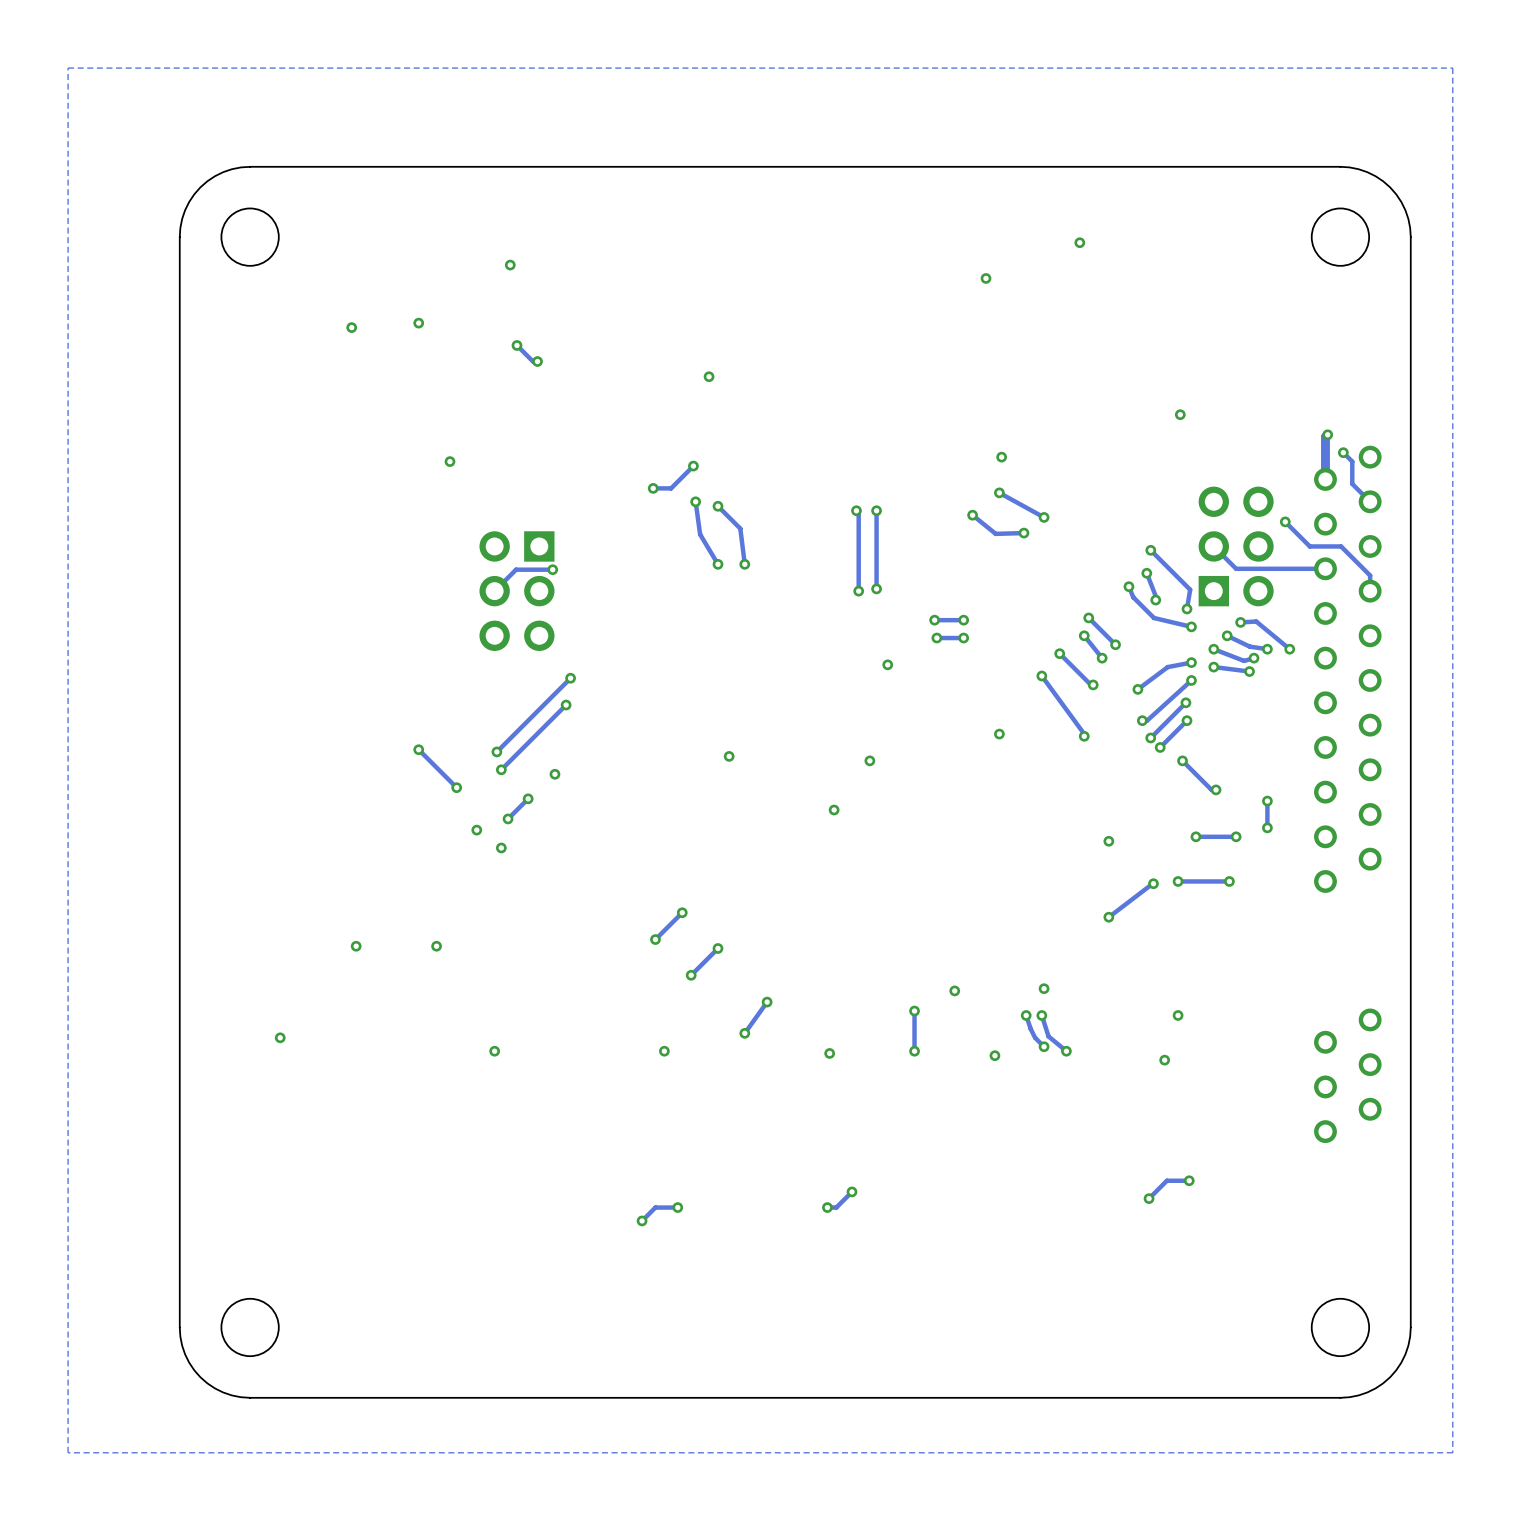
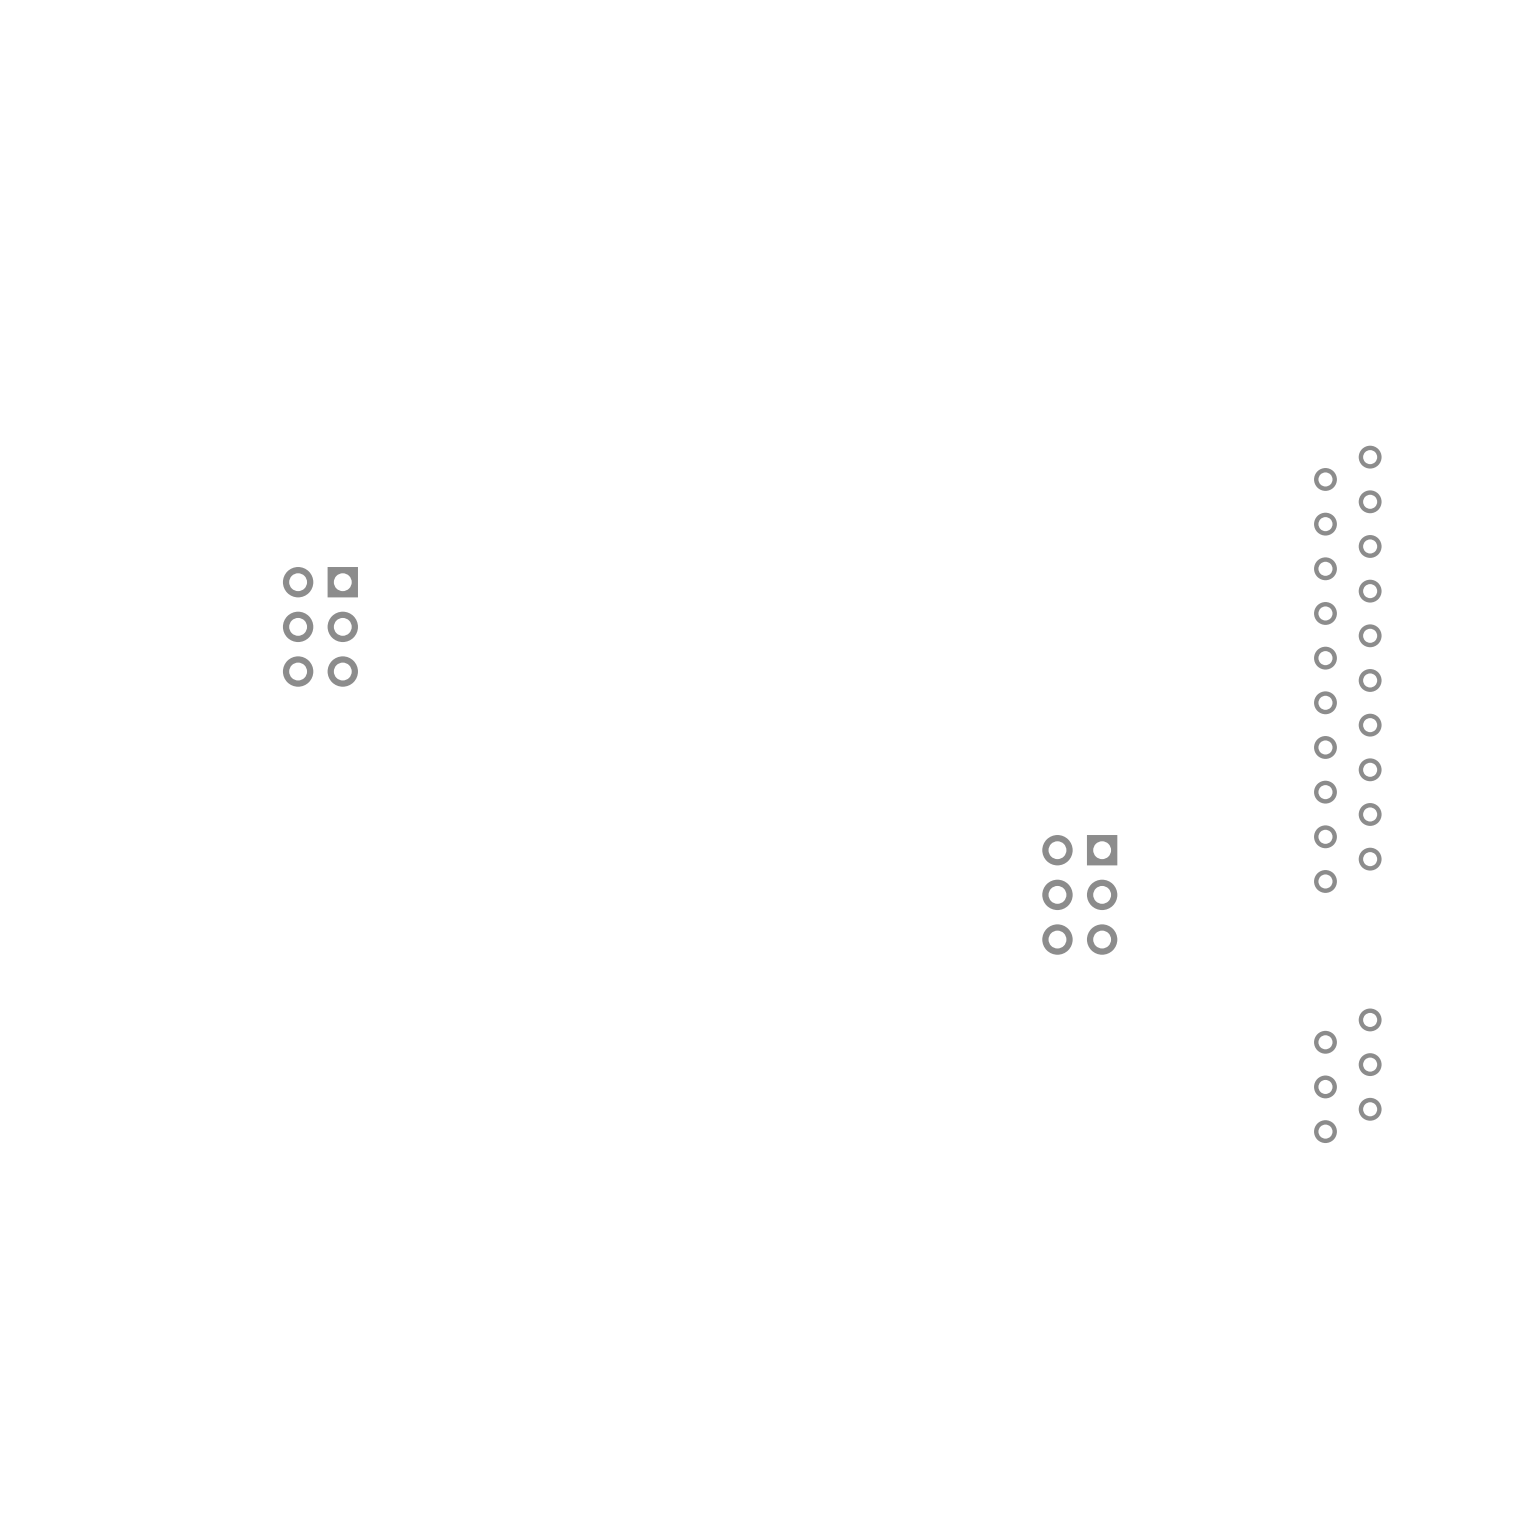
zone outline: (1452, 68) (1452, 1452) (68, 1452) (68, 68) (1452, 68) -> none
board edge: (1340, 166) (250, 166) (223, 172) (200, 187) (185, 210) (179, 237) (179, 1327) (185, 1354) (200, 1377) (223, 1392) (250, 1397) (1340, 1397) (1367, 1392) (1390, 1377) (1405, 1354) (1410, 1327) (1410, 237) (1405, 210) (1390, 187) (1367, 172) (1340, 166) -> none
round board edge: [220, 207, 280, 267] -> none
round board edge: [1310, 207, 1371, 267] -> none
via: (1079, 242) -> none
via: (510, 265) -> none
via: (986, 278) -> none
via: (418, 323) -> none
via: (351, 327) -> none
track: (516, 345) (533, 361) (537, 361) -> none
via: (516, 345) -> none
via: (537, 361) -> none
via: (709, 376) -> none
via: (1180, 414) -> none
track: (1327, 434) (1325, 437) (1325, 479) -> none
via: (1327, 434) -> none
track: (1343, 452) (1352, 461) (1352, 483) (1370, 501) -> none
via: (1343, 452) -> none
via: (1001, 457) -> none
via: (449, 461) -> none
track: (693, 466) (671, 488) (653, 488) -> none
via: (693, 466) -> none
via: (653, 488) -> none
track: (999, 492) (1044, 517) -> none
via: (999, 492) -> none
track: (695, 501) (700, 534) (717, 564) -> none
via: (695, 501) -> none
track: (717, 506) (740, 528) (744, 564) -> none
via: (717, 506) -> none
track: (856, 510) (858, 512) (858, 591) -> none
via: (856, 510) -> none
track: (876, 510) (876, 588) -> none
via: (876, 510) -> none
track: (972, 515) (995, 533) (1023, 533) -> none
via: (972, 515) -> none
via: (1044, 517) -> none
track: (1285, 521) (1309, 546) (1341, 546) (1370, 575) (1370, 591) -> none
via: (1285, 521) -> none
via: (1023, 533) -> none
track: (1213, 546) (1236, 568) (1325, 568) -> none
part: (1236, 546) -> none
track: (1150, 550) (1190, 589) (1187, 609) -> none
via: (1150, 550) -> none
via: (717, 564) -> none
via: (744, 564) -> none
track: (552, 569) (516, 569) (494, 591) -> none
via: (552, 569) -> none
track: (1146, 573) (1155, 600) -> none
via: (1146, 573) -> none
track: (1128, 586) (1133, 597) (1154, 618) (1191, 626) -> none
via: (1128, 586) -> none
via: (876, 588) -> none
part position: (516, 591) -> (320, 626)
via: (858, 591) -> none
via: (1155, 600) -> none
via: (1187, 609) -> none
track: (1088, 617) (1115, 644) -> none
via: (1088, 617) -> none
via: (934, 620) -> none
track: (963, 620) (934, 620) -> none
via: (963, 620) -> none
track: (1240, 622) (1256, 621) (1289, 649) -> none
via: (1240, 622) -> none
via: (1191, 626) -> none
track: (1084, 635) (1102, 658) -> none
via: (1084, 635) -> none
track: (1227, 635) (1249, 646) (1267, 649) -> none
via: (1227, 635) -> none
via: (936, 638) -> none
track: (963, 638) (936, 638) -> none
via: (963, 638) -> none
via: (1115, 644) -> none
track: (1213, 649) (1244, 660) (1254, 658) -> none
via: (1213, 649) -> none
via: (1267, 649) -> none
via: (1289, 649) -> none
track: (1059, 653) (1090, 684) (1093, 684) -> none
via: (1059, 653) -> none
via: (1102, 658) -> none
via: (1254, 658) -> none
track: (1191, 662) (1167, 667) (1137, 689) -> none
via: (1191, 662) -> none
via: (887, 664) -> none
track: (1213, 667) (1249, 671) -> none
via: (1213, 667) -> none
via: (1249, 671) -> none
track: (1041, 676) (1084, 736) -> none
via: (1041, 676) -> none
track: (570, 678) (496, 751) -> none
via: (570, 678) -> none
track: (1191, 680) (1147, 720) (1142, 720) -> none
via: (1191, 680) -> none
via: (1093, 684) -> none
via: (1137, 689) -> none
track: (1185, 702) (1150, 737) -> none
via: (1185, 702) -> none
track: (566, 705) (501, 769) -> none
via: (566, 705) -> none
via: (1142, 720) -> none
track: (1187, 720) (1160, 747) -> none
via: (1187, 720) -> none
via: (999, 734) -> none
via: (1084, 736) -> none
via: (1150, 737) -> none
via: (1160, 747) -> none
track: (418, 749) (456, 787) -> none
via: (418, 749) -> none
via: (496, 751) -> none
via: (729, 756) -> none
via: (869, 760) -> none
track: (1182, 760) (1211, 789) (1216, 789) -> none
via: (1182, 760) -> none
via: (501, 769) -> none
via: (554, 774) -> none
via: (456, 787) -> none
via: (1216, 789) -> none
track: (528, 798) (508, 818) -> none
via: (528, 798) -> none
track: (1267, 801) (1267, 827) -> none
via: (1267, 801) -> none
via: (834, 810) -> none
via: (508, 818) -> none
via: (1267, 827) -> none
via: (476, 830) -> none
via: (1195, 836) -> none
track: (1236, 836) (1195, 836) -> none
via: (1236, 836) -> none
via: (1108, 841) -> none
via: (501, 847) -> none
via: (1178, 881) -> none
track: (1229, 881) (1178, 881) -> none
via: (1229, 881) -> none
track: (1153, 883) (1108, 917) -> none
via: (1153, 883) -> none
part: none -> (1079, 894)
track: (682, 912) (655, 939) -> none
via: (682, 912) -> none
via: (1108, 917) -> none
via: (655, 939) -> none
via: (356, 946) -> none
via: (436, 946) -> none
track: (717, 948) (691, 975) -> none
via: (717, 948) -> none
via: (691, 975) -> none
via: (1044, 988) -> none
via: (954, 990) -> none
track: (767, 1002) (744, 1033) -> none
via: (767, 1002) -> none
track: (914, 1011) (914, 1051) -> none
via: (914, 1011) -> none
track: (1026, 1015) (1035, 1037) (1044, 1046) -> none
via: (1026, 1015) -> none
track: (1041, 1015) (1048, 1036) (1066, 1051) -> none
via: (1041, 1015) -> none
via: (1178, 1015) -> none
via: (744, 1033) -> none
via: (280, 1037) -> none
via: (1044, 1046) -> none
via: (494, 1051) -> none
via: (664, 1051) -> none
via: (914, 1051) -> none
via: (1066, 1051) -> none
via: (829, 1053) -> none
via: (994, 1055) -> none
via: (1164, 1060) -> none
track: (1189, 1180) (1166, 1180) (1149, 1198) -> none
via: (1189, 1180) -> none
track: (851, 1191) (836, 1207) (827, 1207) -> none
via: (851, 1191) -> none
via: (1149, 1198) -> none
track: (677, 1207) (655, 1207) (642, 1220) -> none
via: (677, 1207) -> none
via: (827, 1207) -> none
via: (642, 1220) -> none
round board edge: [220, 1297, 280, 1358] -> none
round board edge: [1310, 1297, 1371, 1358] -> none

